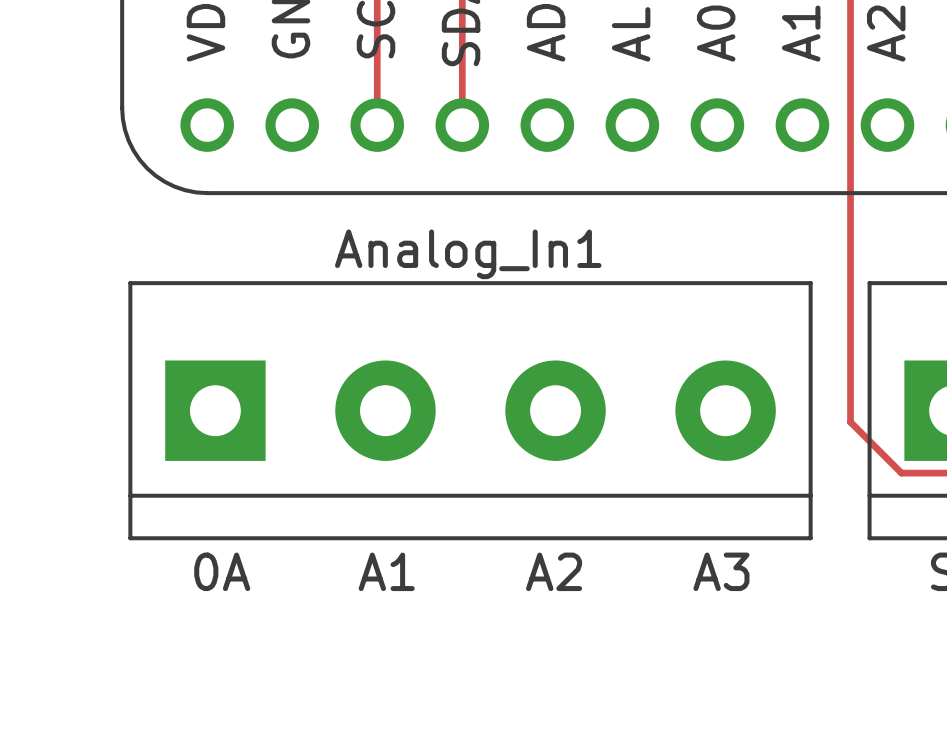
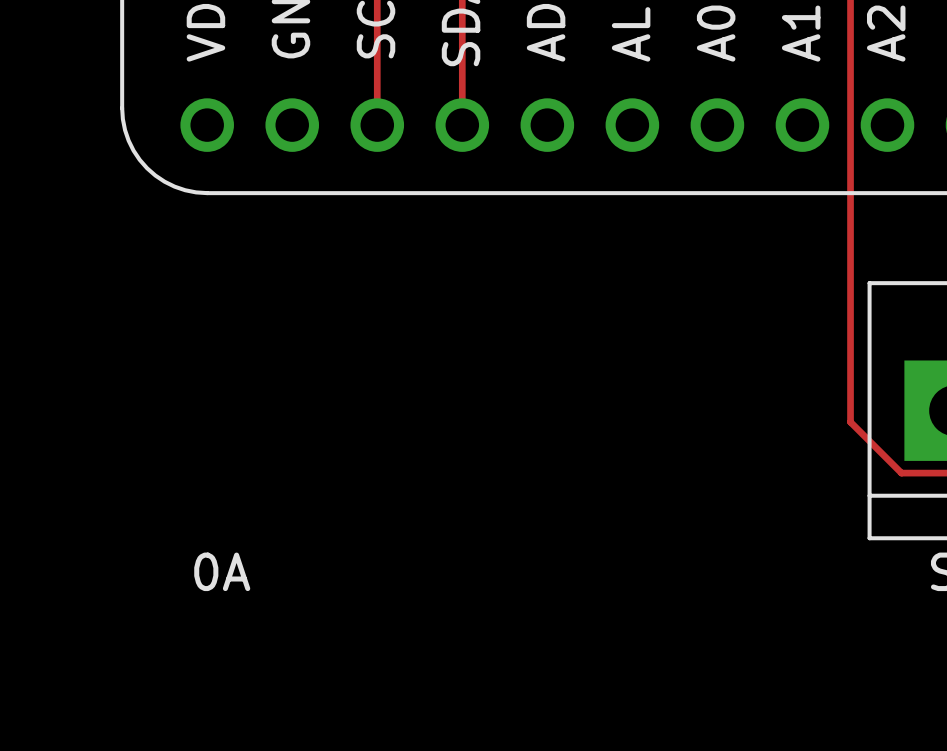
Analog_In1: (470, 410) -> none
text: A1 (386, 571) -> none
text: A2 (554, 571) -> none
text: A3 (721, 571) -> none

